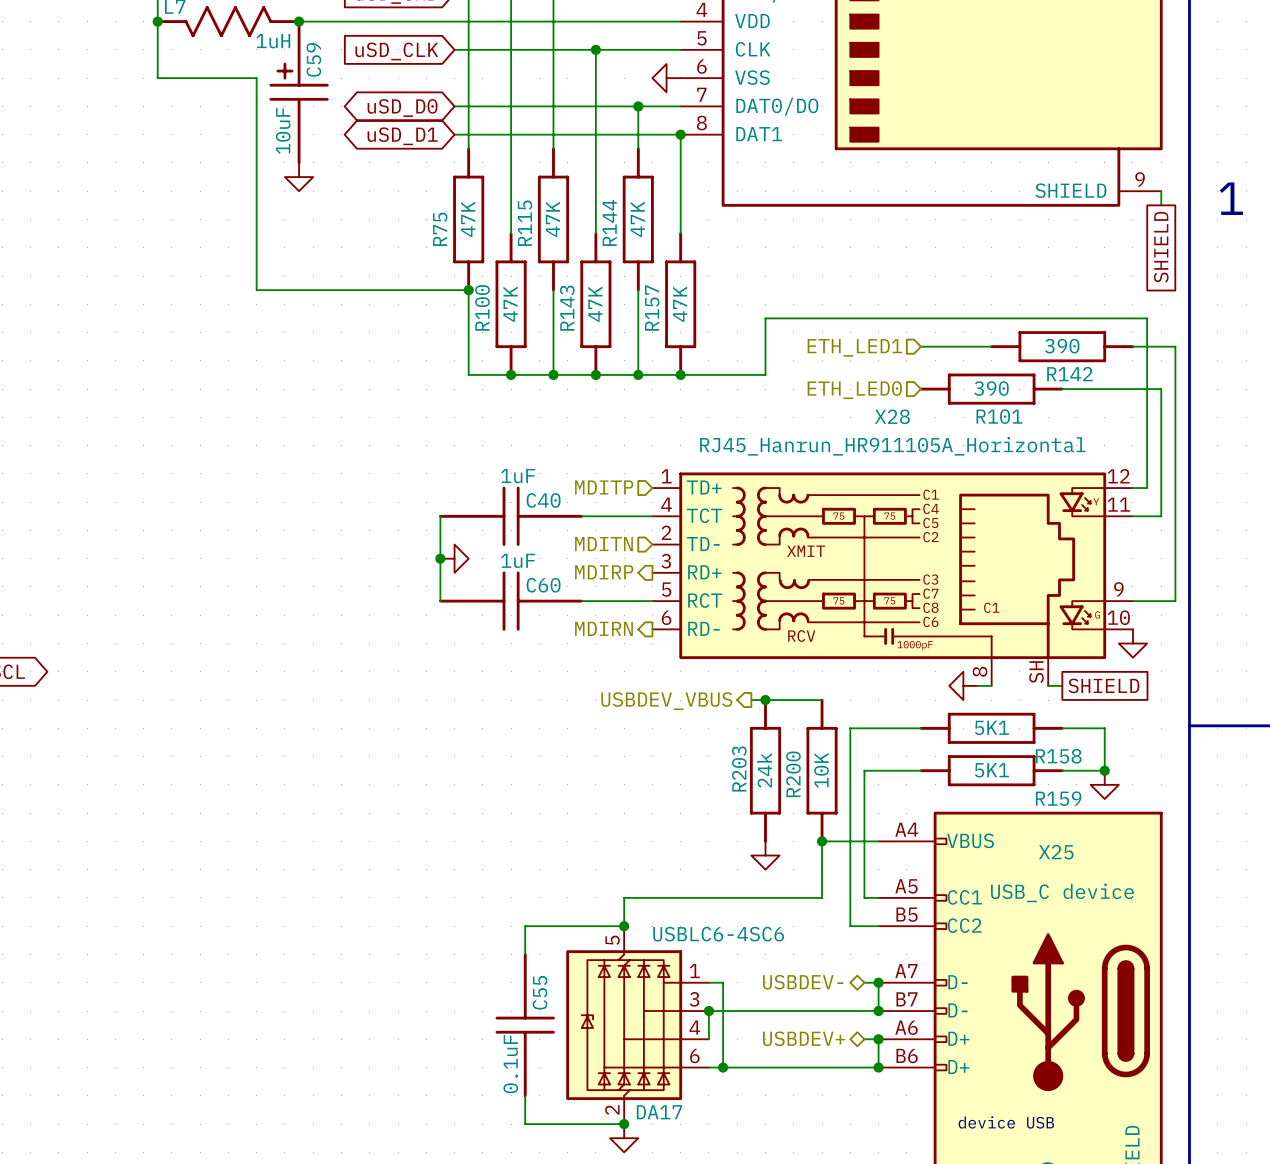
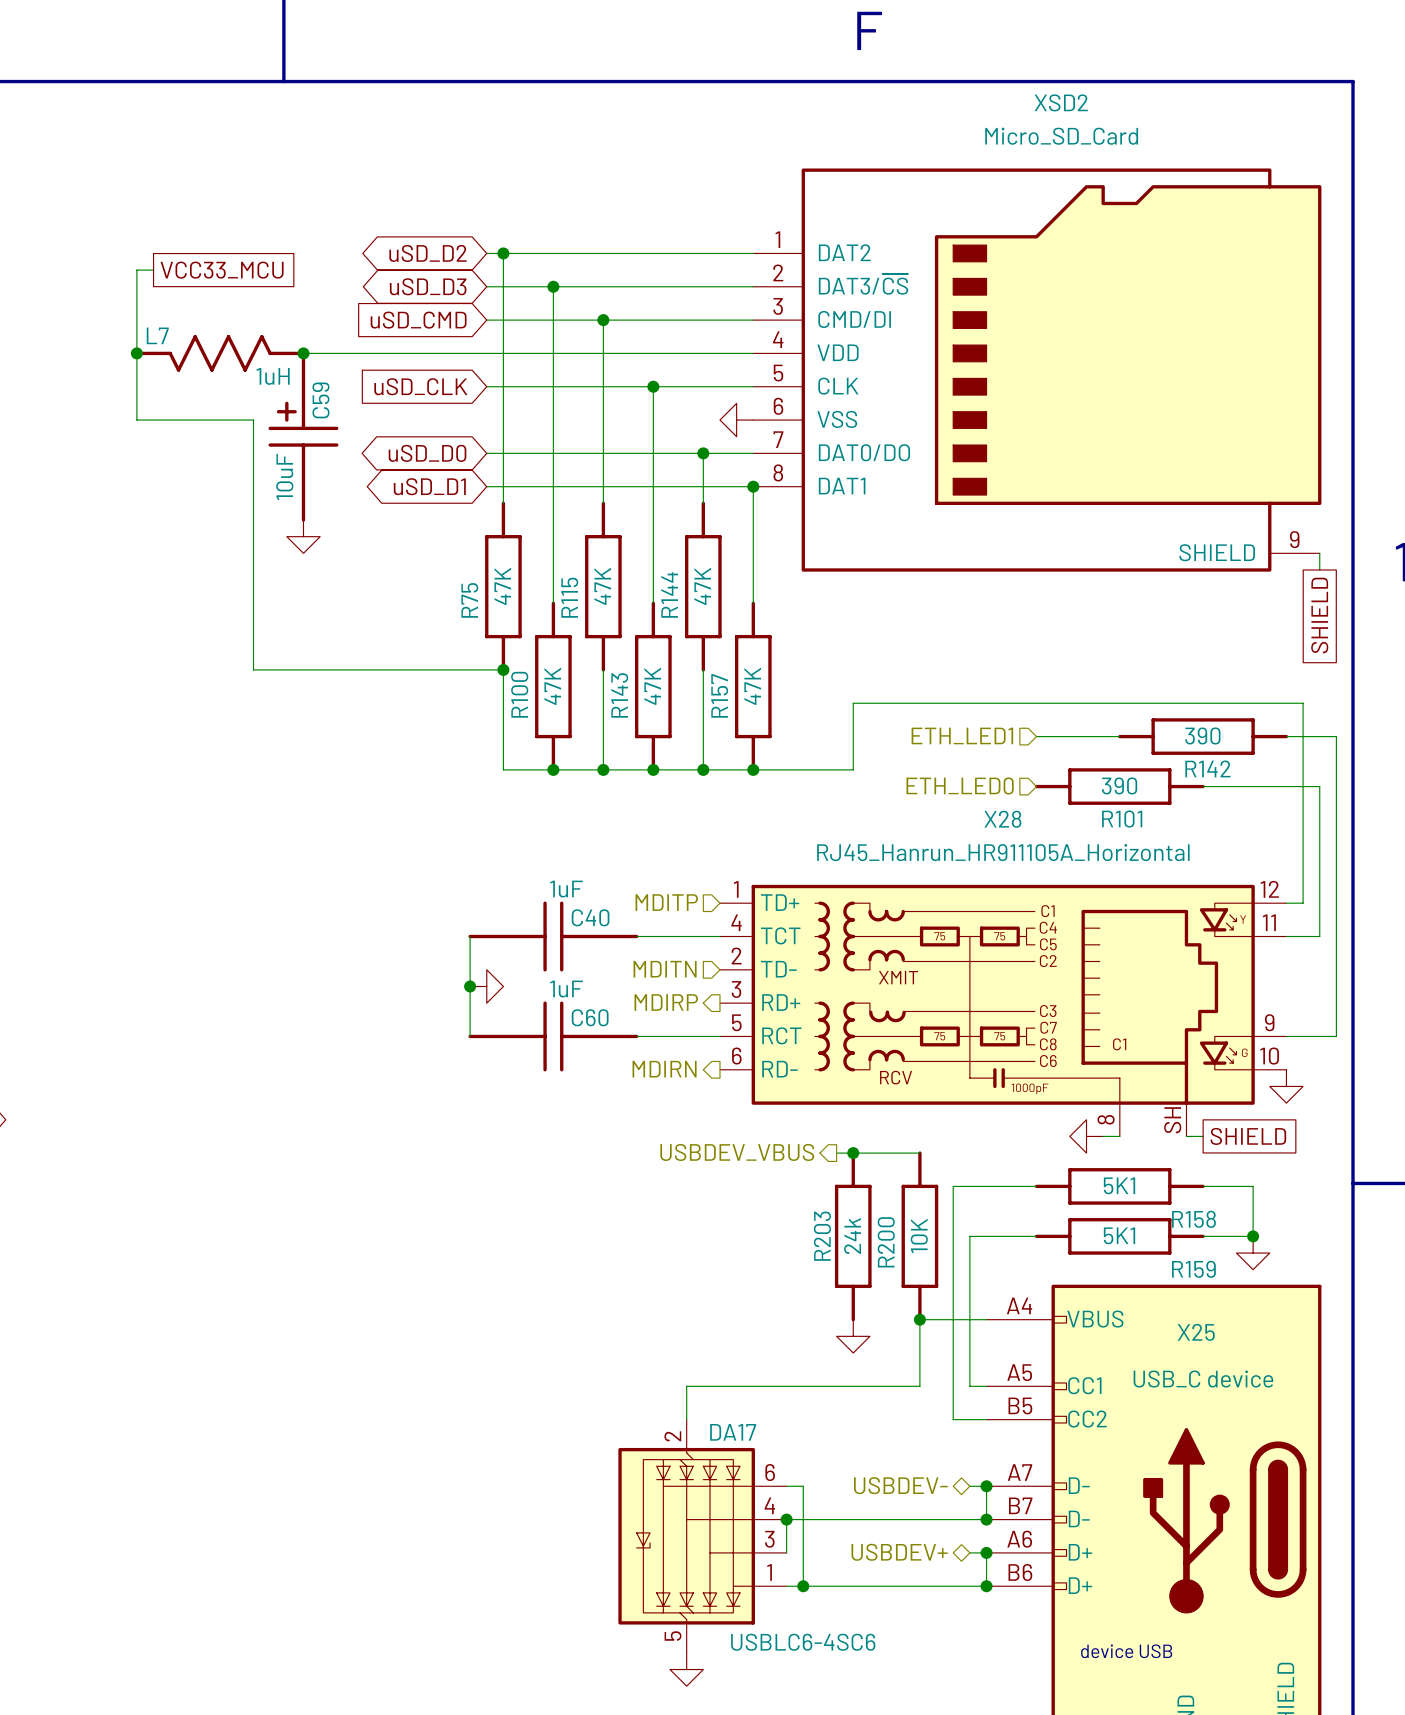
wire: (624, 926) (525, 926) (525, 954) -> none
junction: (624, 926) -> none
C55: 0.1uF (525, 1025) -> none
DA17 flip: as is (624, 1025) -> up-down (686, 1536)
wire: (525, 1095) (525, 1124) (624, 1124) -> none
junction: (624, 1124) -> none

